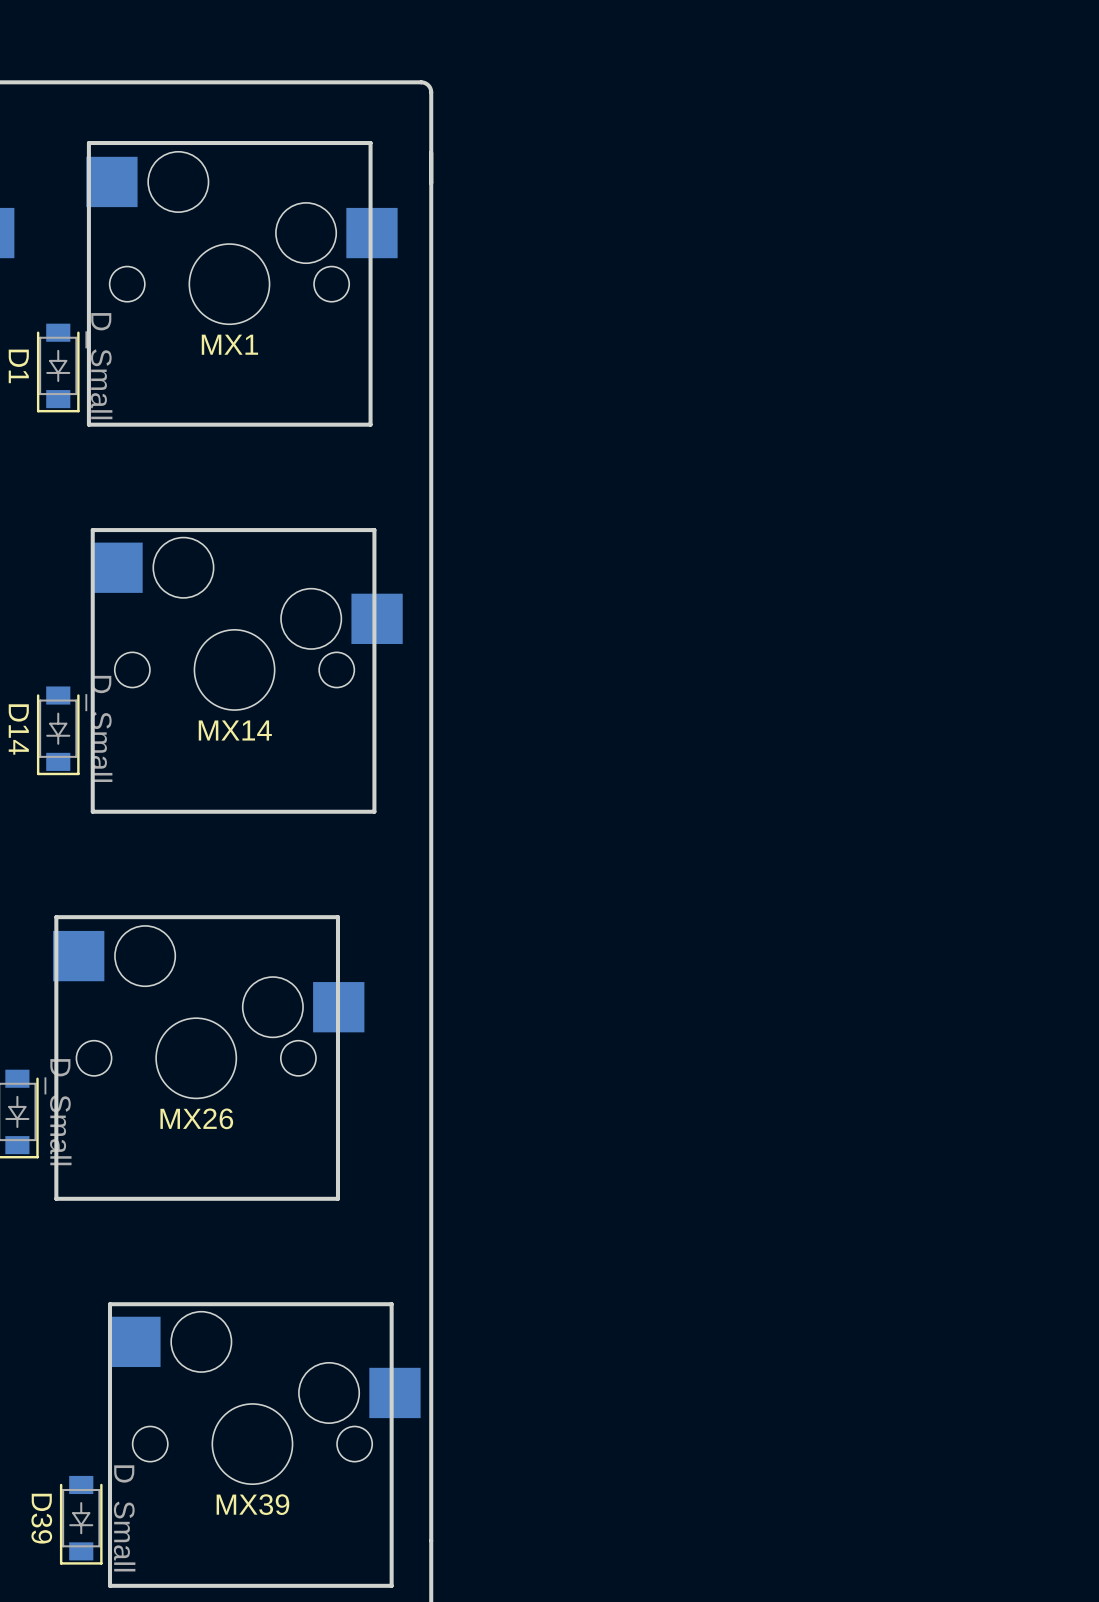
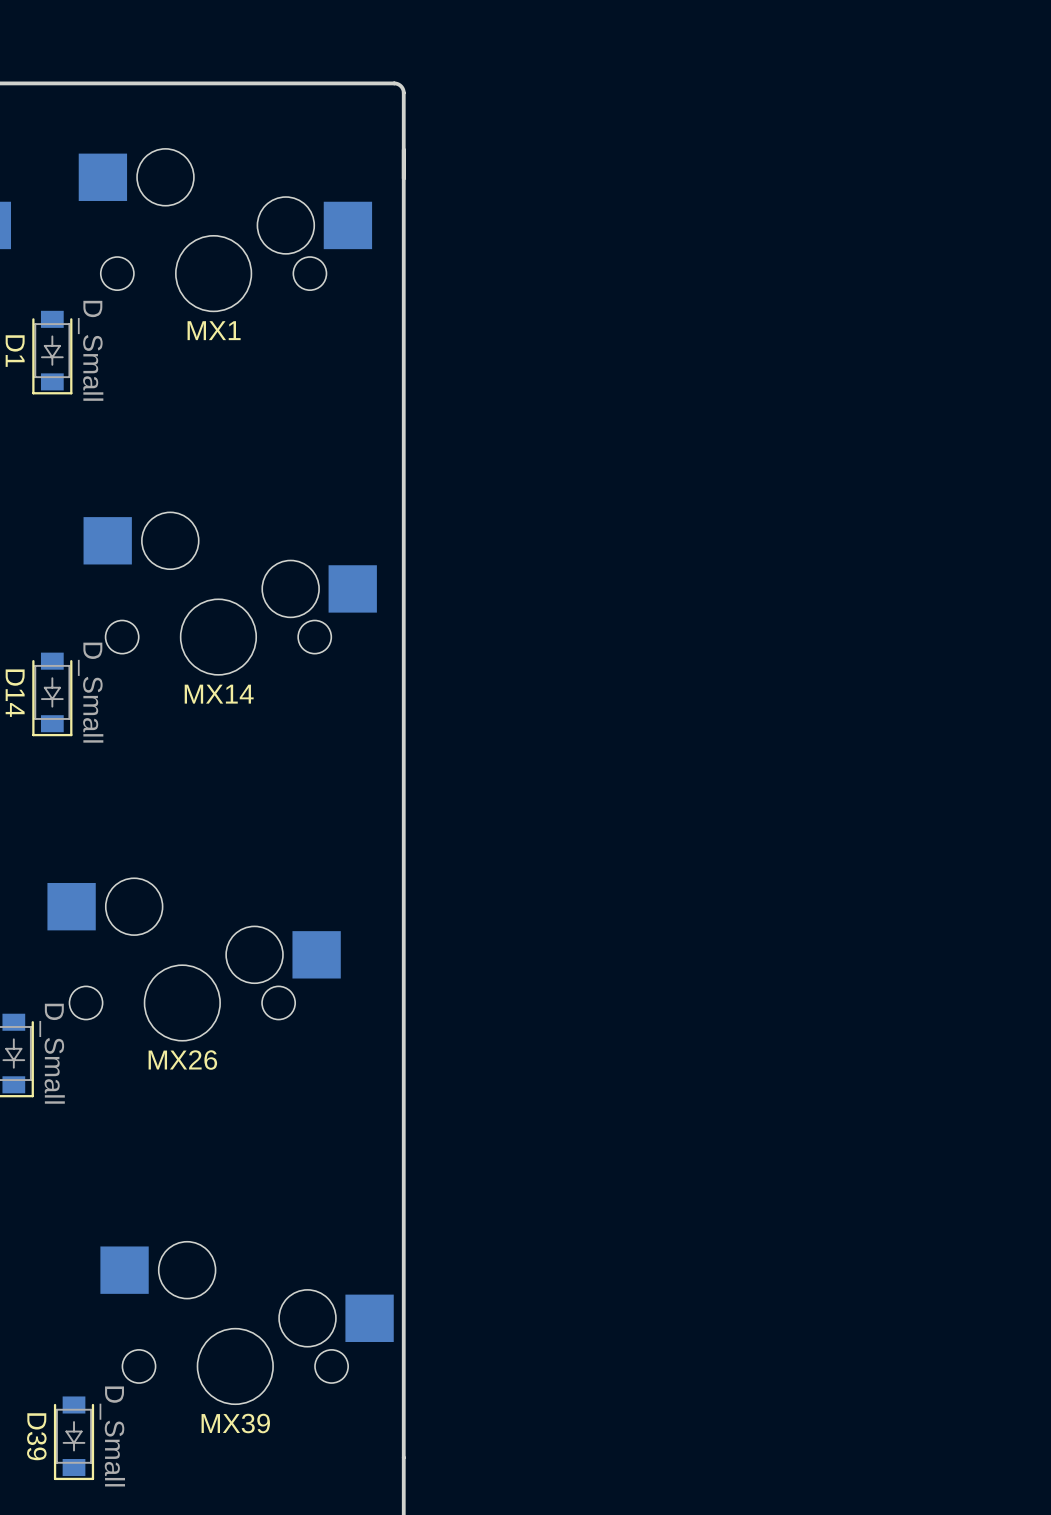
board edge: (370, 143) (370, 424) (88, 424) (88, 143) (370, 143) -> none
board edge: (374, 530) (374, 811) (92, 811) (92, 530) (374, 530) -> none
board edge: (337, 917) (56, 917) (56, 1198) (337, 1198) (337, 917) -> none
board edge: (391, 1304) (391, 1585) (110, 1585) (110, 1304) (391, 1304) -> none

